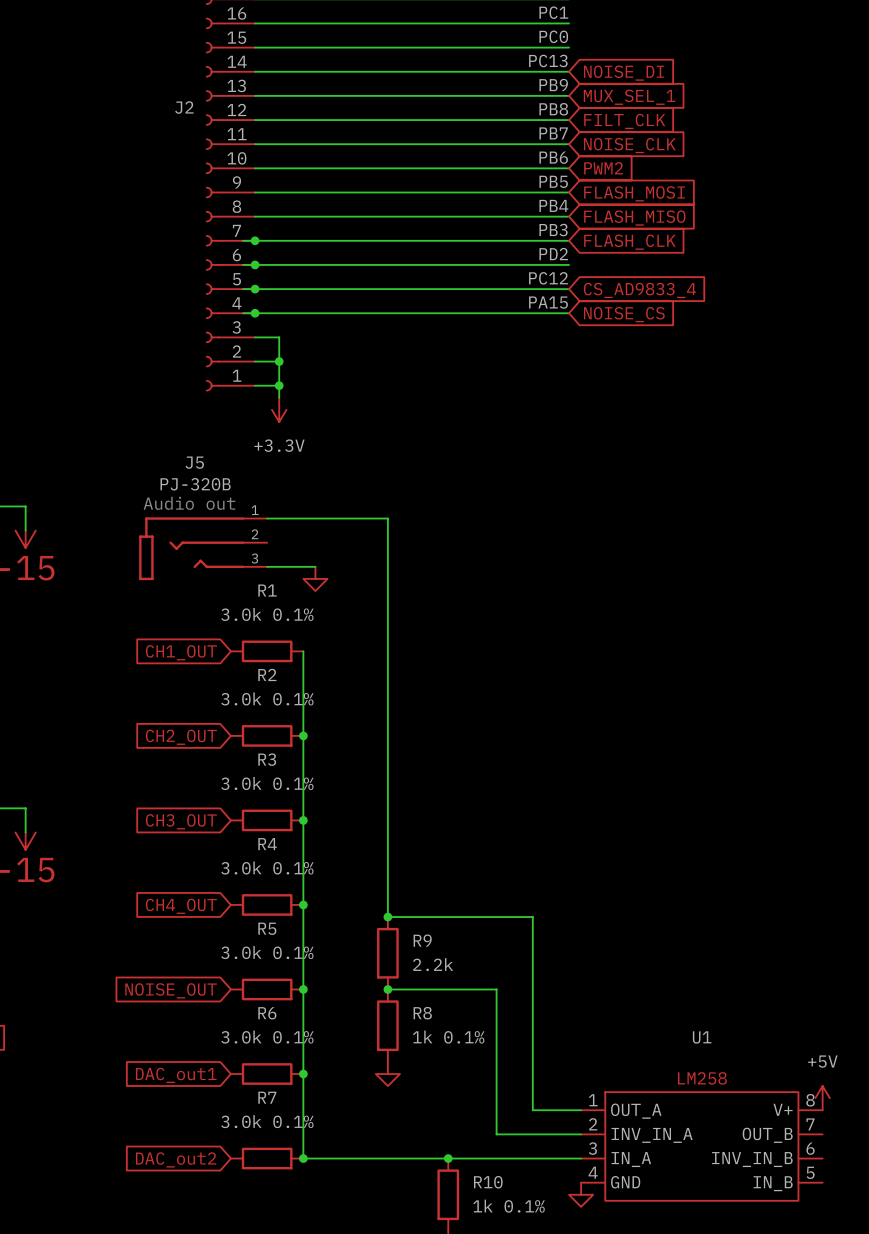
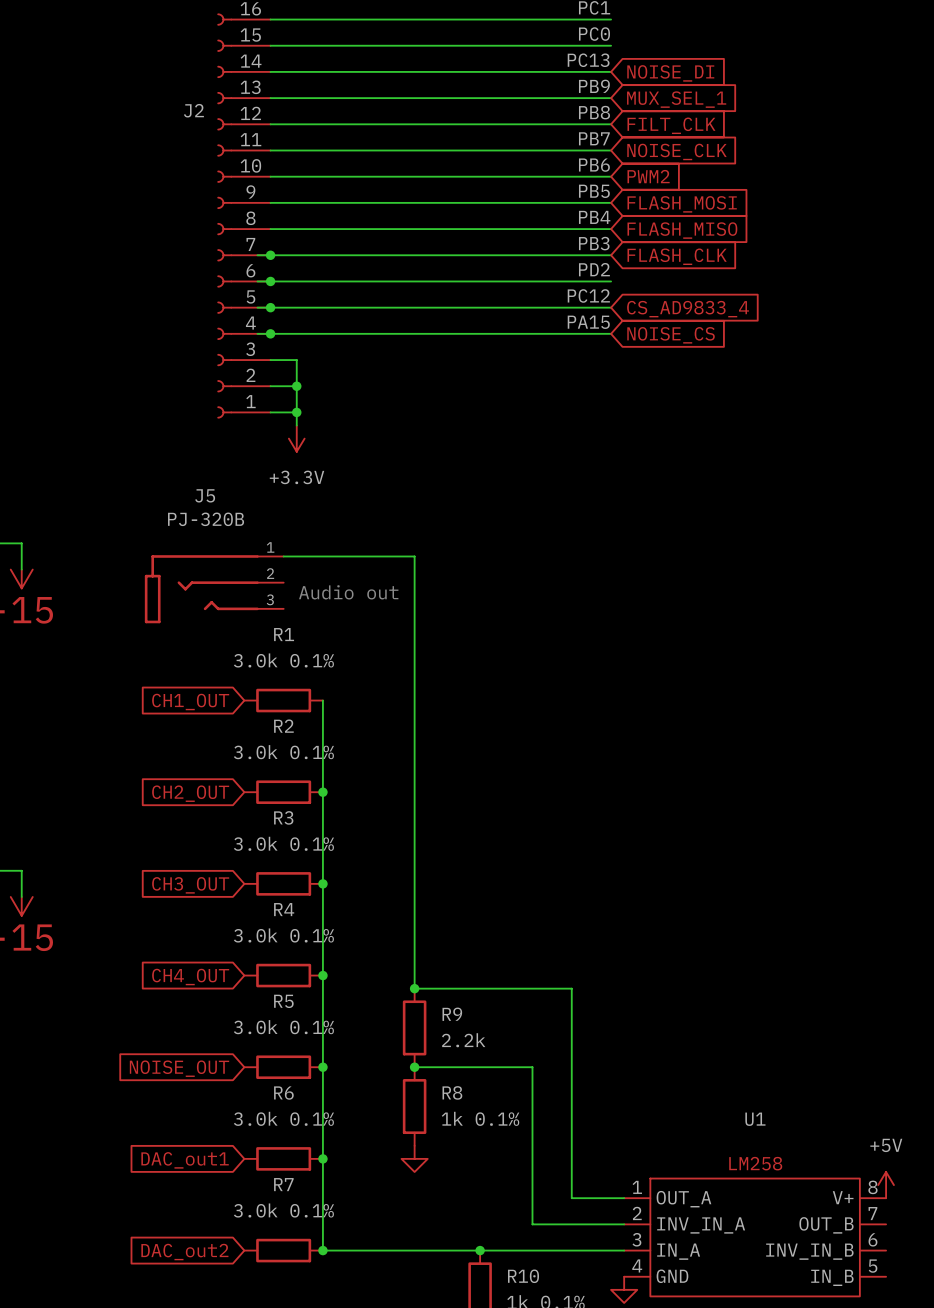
text position: Audio out (189, 503) -> Audio out (348, 592)
wire: (267, 566) (315, 566) -> none
power symbol: (315, 578) -> none

